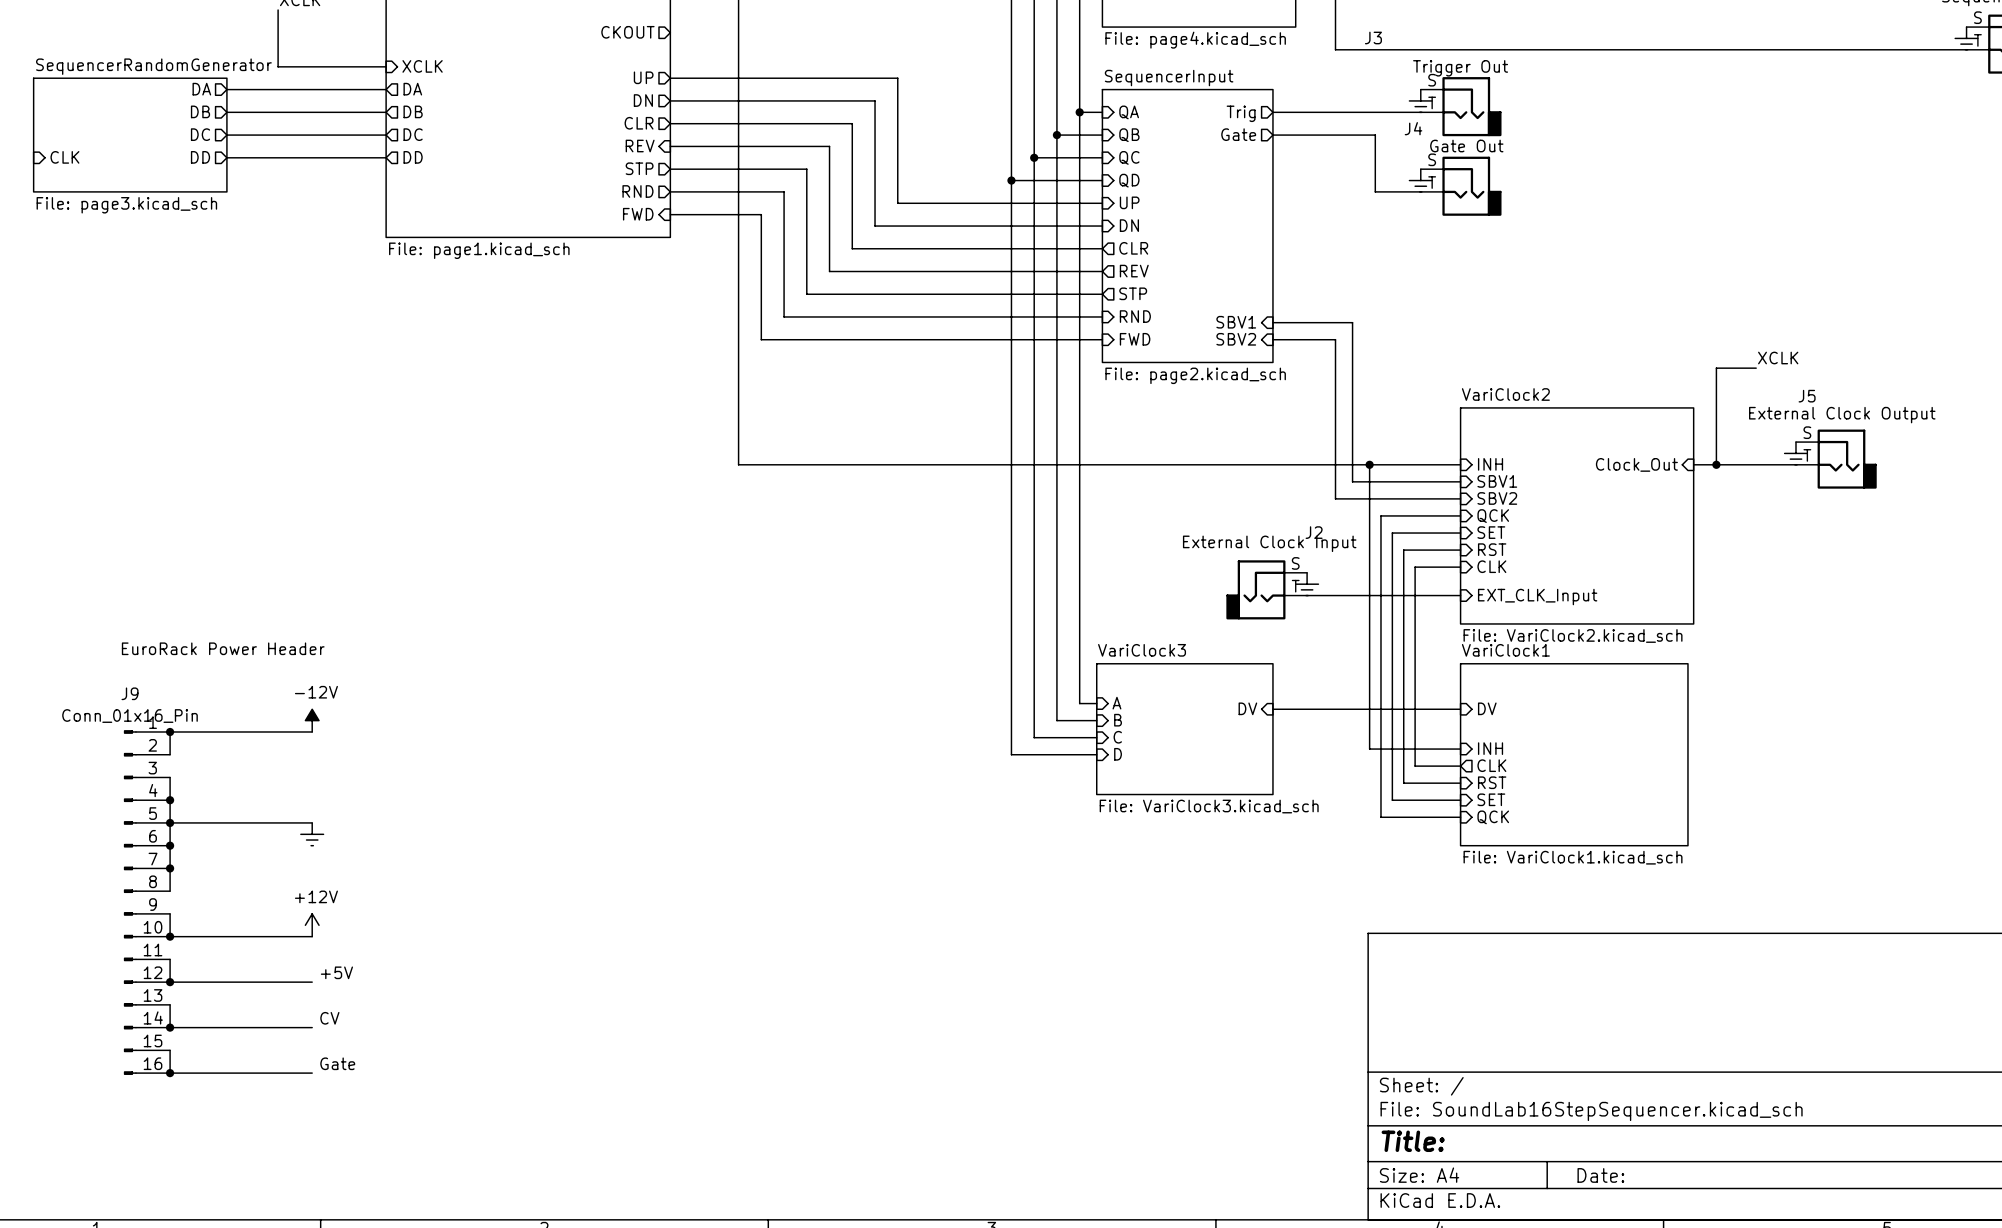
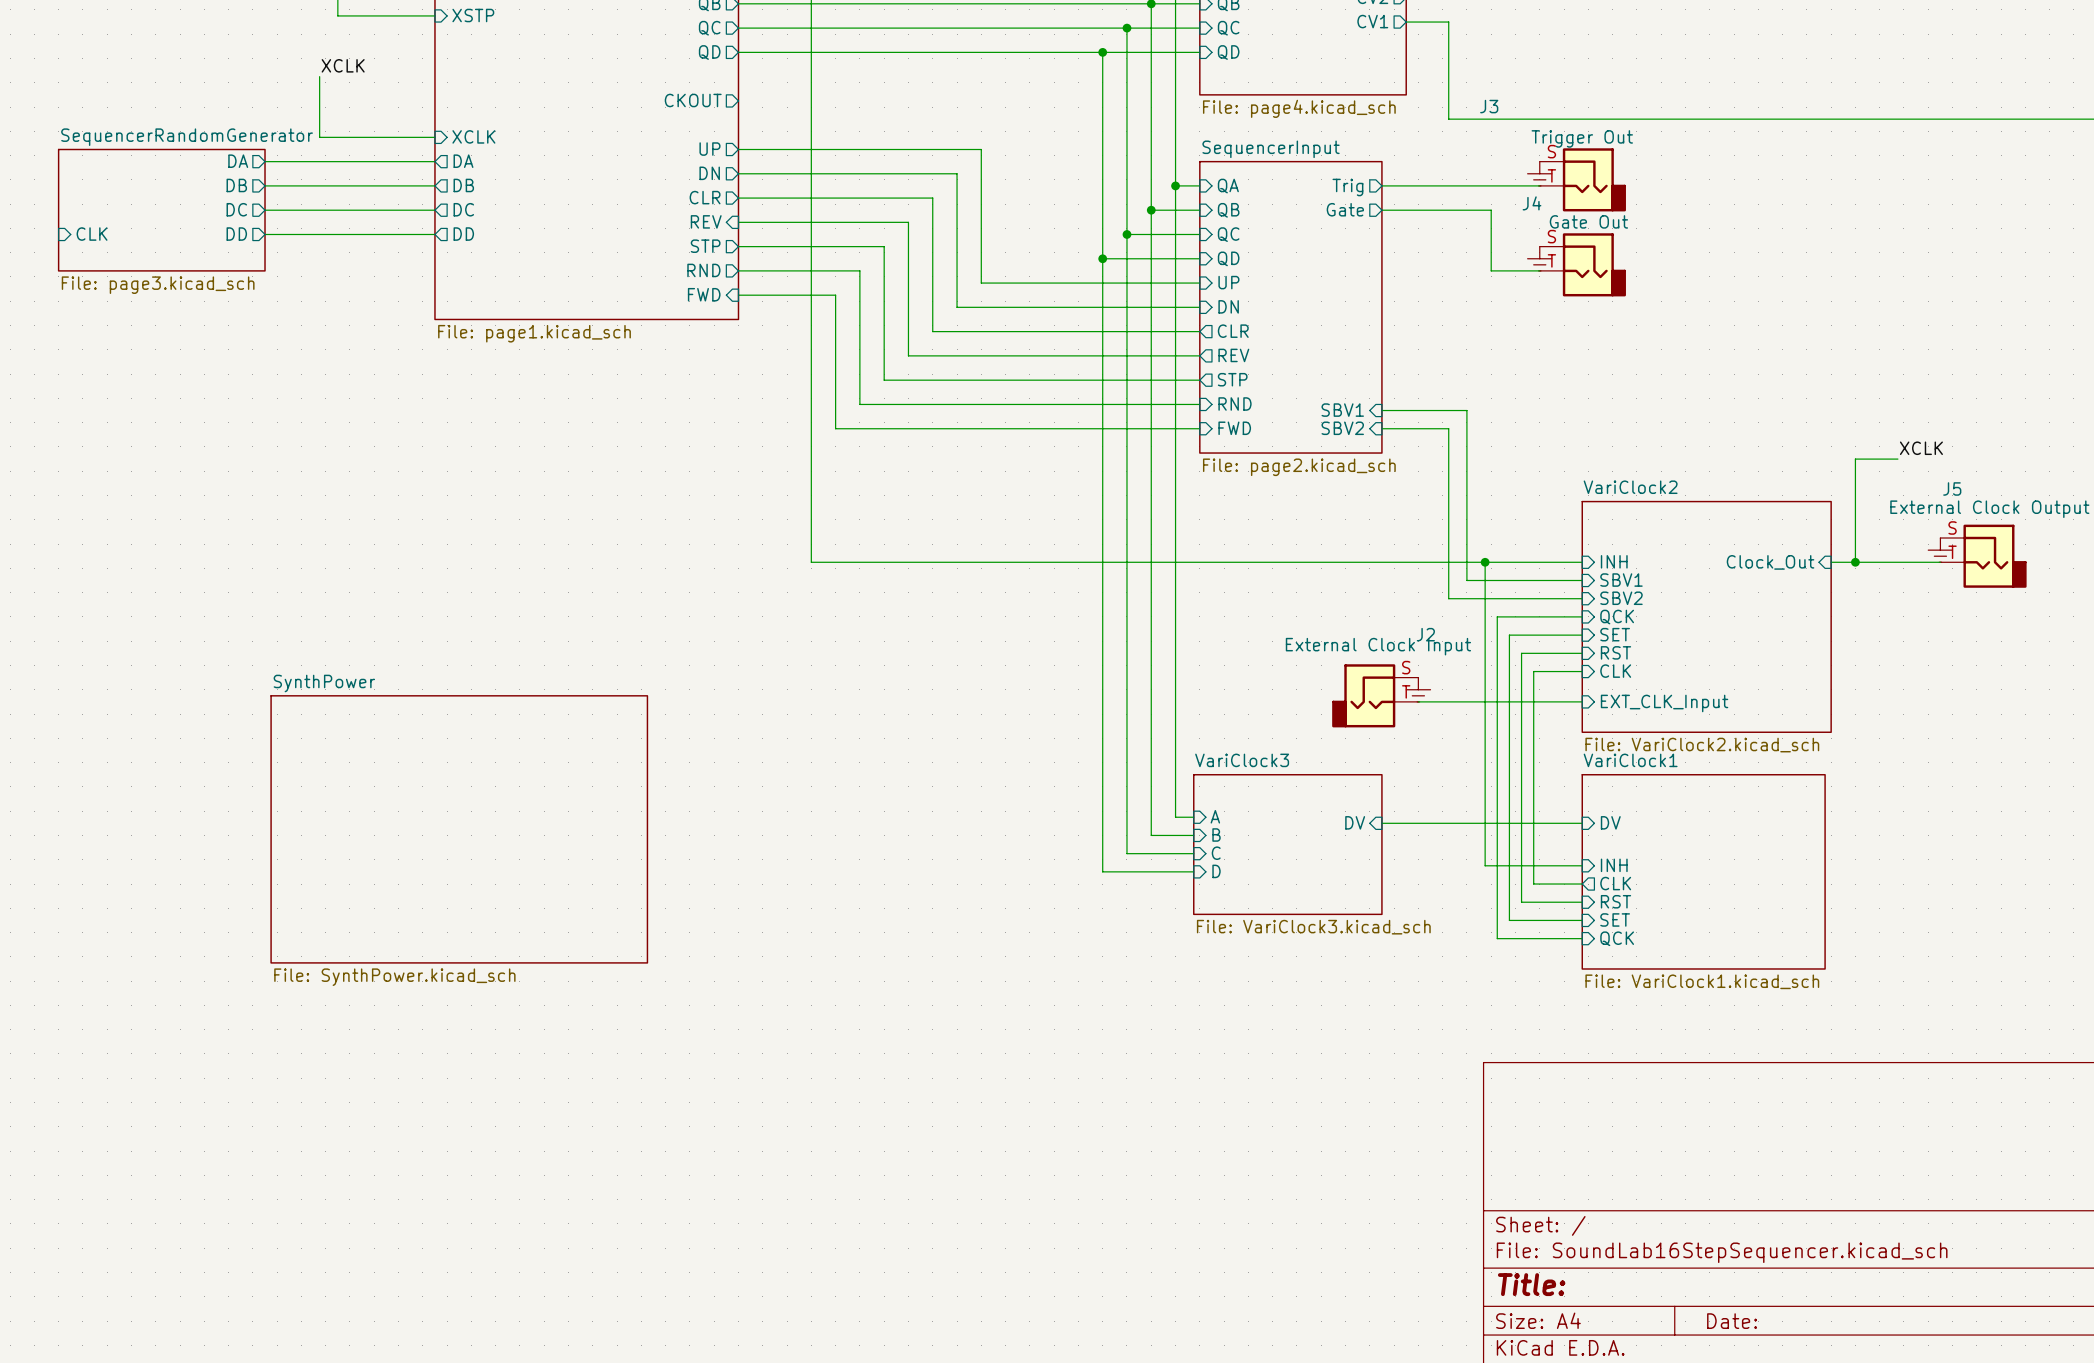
text: EuroRack Power Header (223, 648) -> none
sheet SynthPower: none -> File: SynthPower.kicad_sch (459, 829)
power symbol: -12V (312, 720) -> none
junction: (170, 731) -> none
wire: (312, 731) (170, 731) (170, 754) -> none
wire: (170, 777) (170, 891) -> none
junction: (170, 800) -> none
wire: (170, 822) (312, 822) -> none
junction: (170, 822) -> none
power symbol: (312, 834) -> none
junction: (170, 845) -> none
junction: (170, 868) -> none
J9: Conn_01x16_Pin (146, 902) -> none
wire: (170, 913) (170, 936) (312, 936) -> none
power symbol: +12V (312, 925) -> none
junction: (170, 936) -> none
wire: (170, 959) (170, 982) (312, 982) -> none
text: +5V (336, 972) -> none
junction: (170, 982) -> none
wire: (170, 1004) (170, 1027) (312, 1027) -> none
text: CV (329, 1018) -> none
junction: (170, 1027) -> none
wire: (170, 1050) (170, 1073) (312, 1073) -> none
text: Gate (337, 1063) -> none
junction: (170, 1073) -> none

